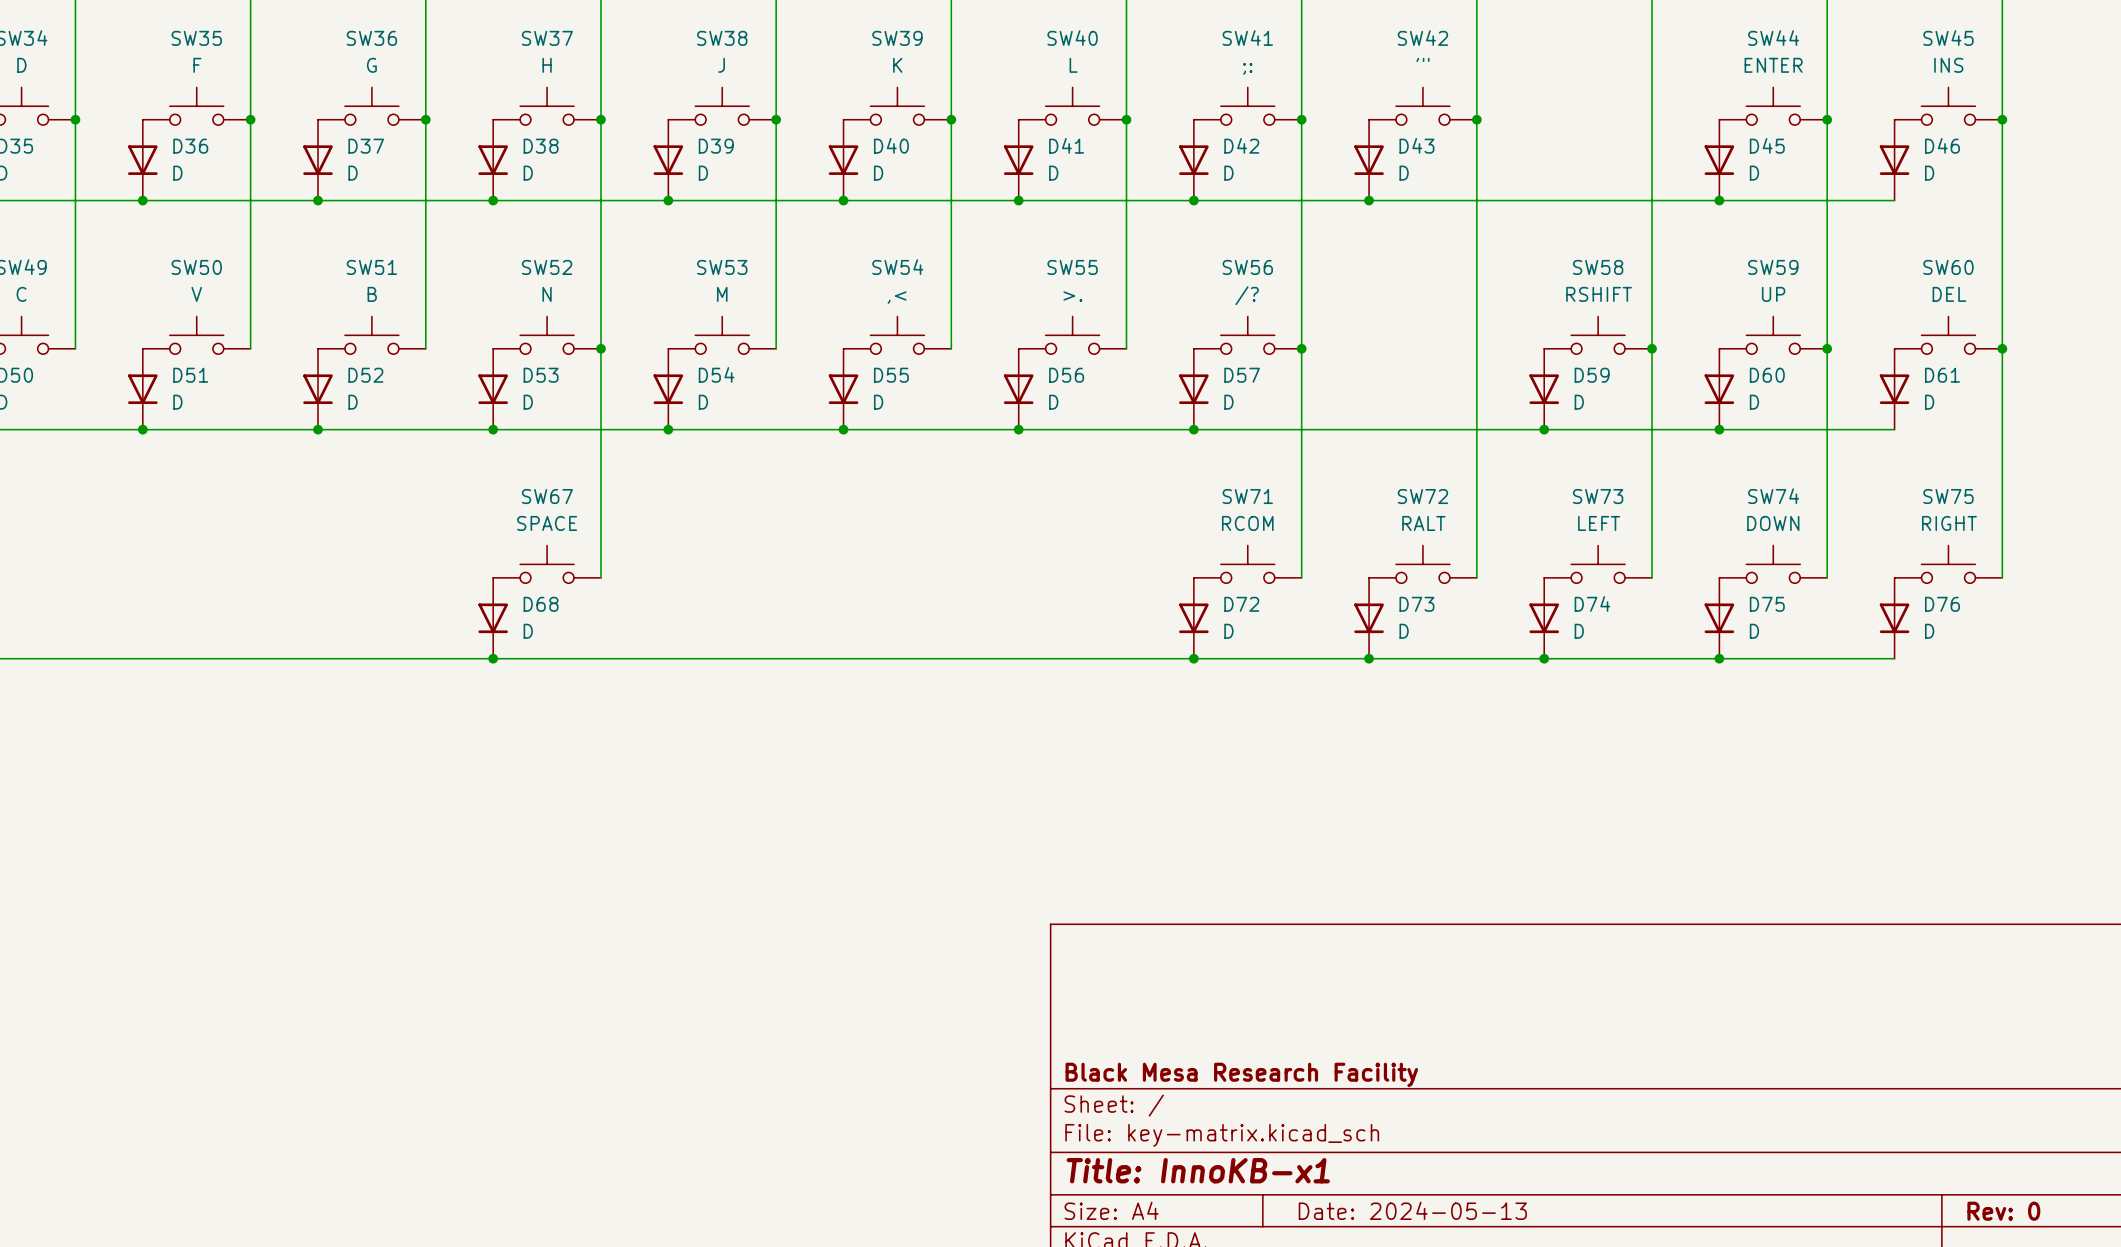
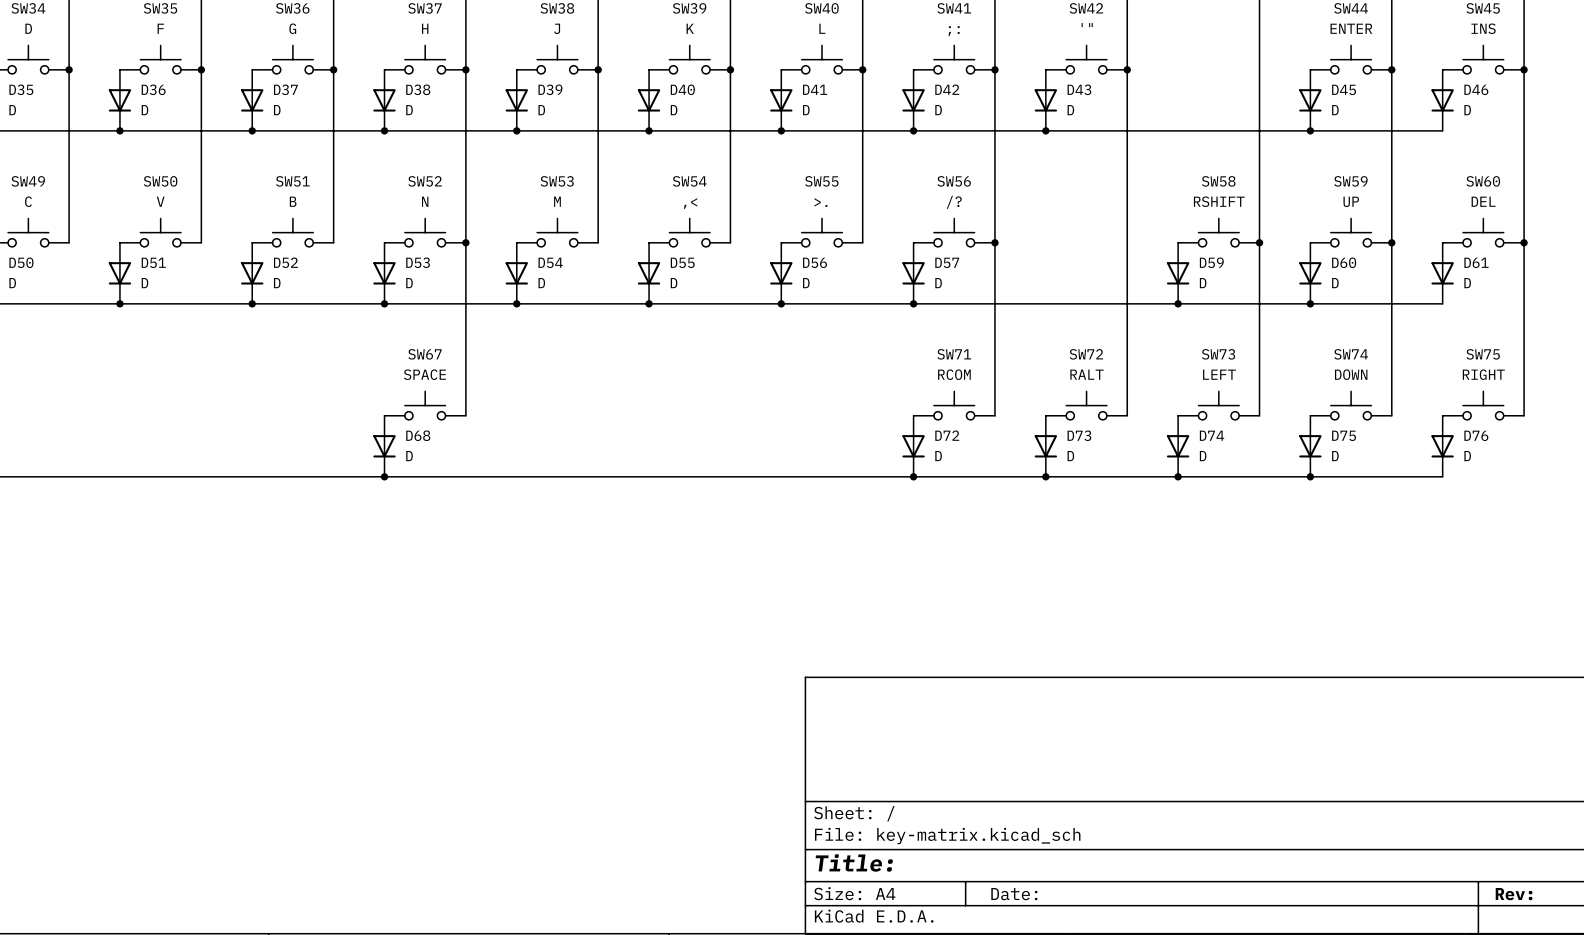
title block: Black Mesa Research Facility (1241, 1074) -> none
title block: Title: InnoKB-x1 (1198, 1170) -> Title: (854, 862)
title block: Date: 2024-05-13 (1412, 1210) -> Date: (1014, 894)
title block: Rev: 0 (2003, 1211) -> Rev: (1514, 894)

